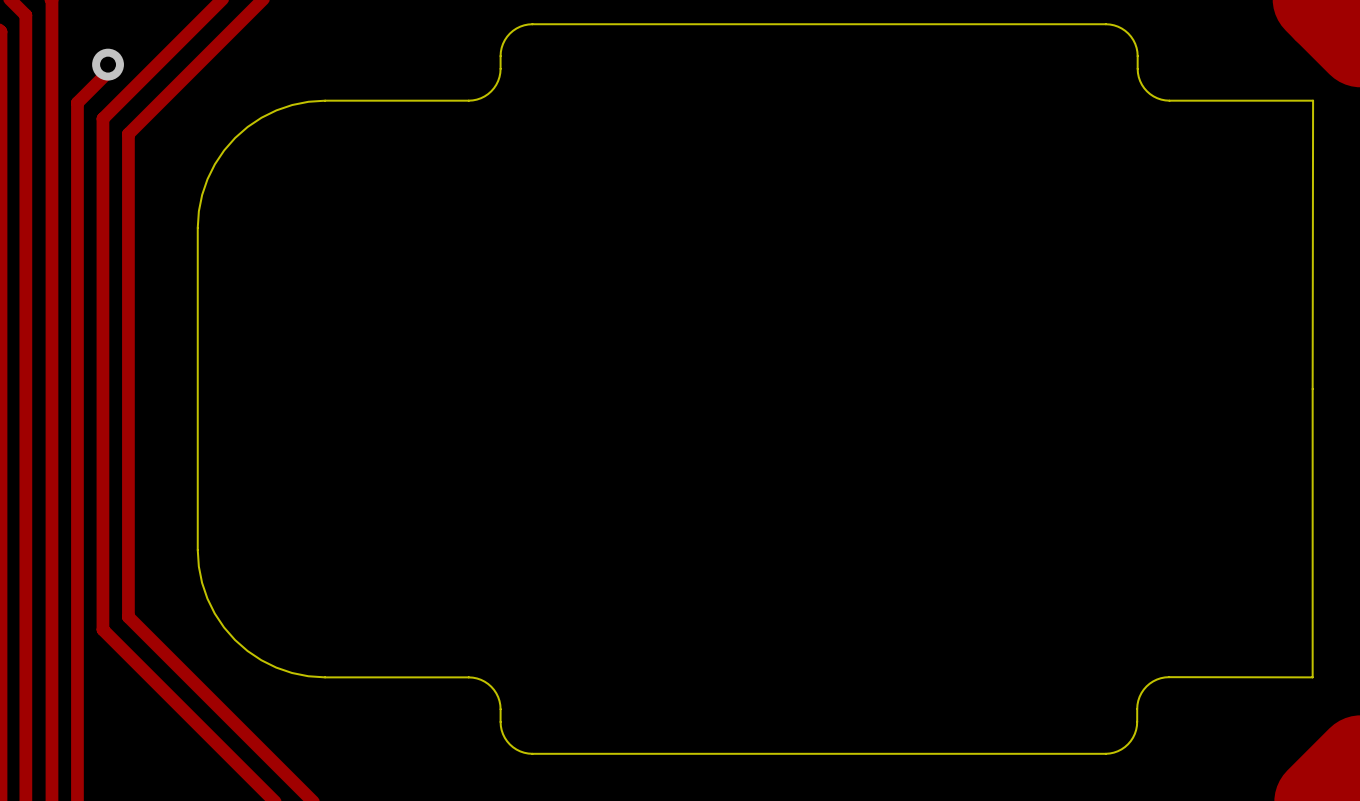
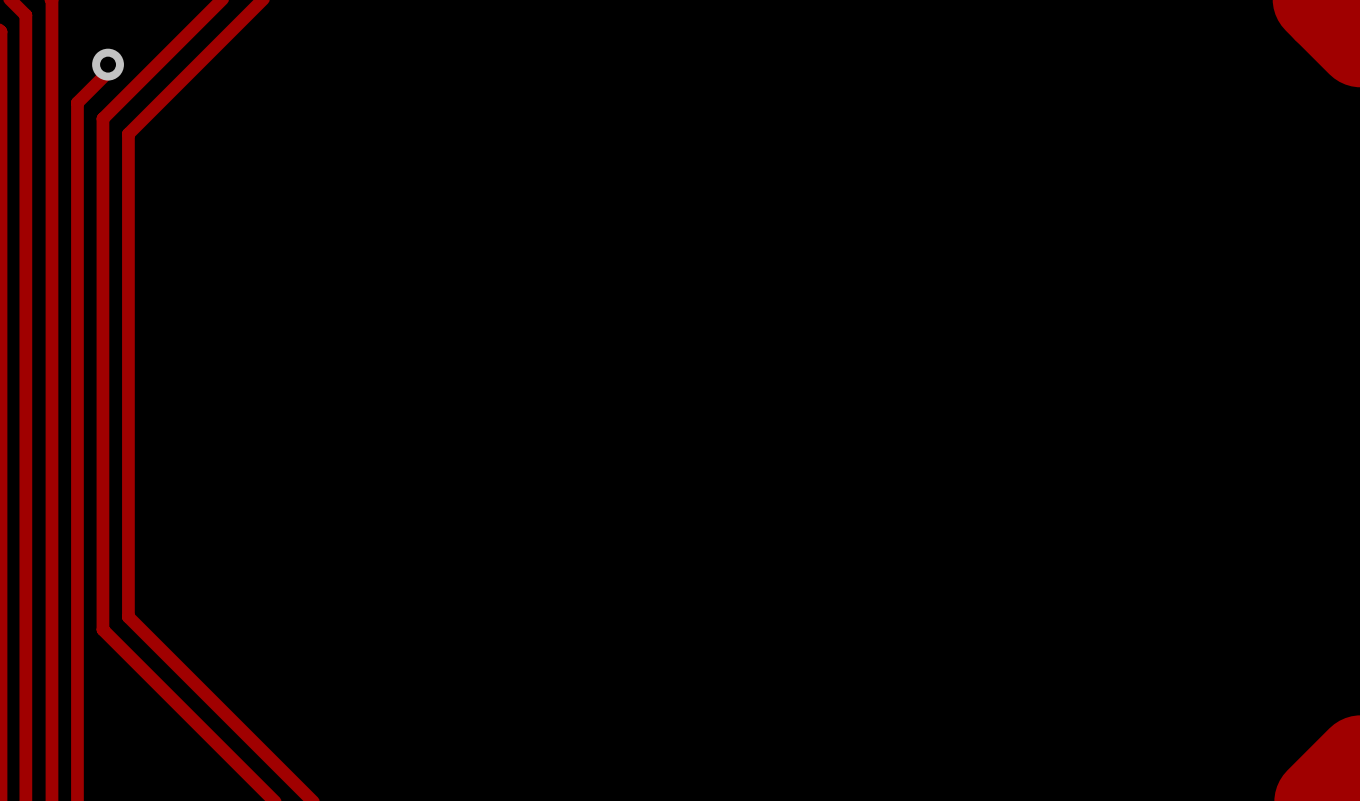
board edge: (197, 227) (202, 194) (214, 164) (235, 137) (261, 117) (276, 110) (308, 101) (468, 100) (480, 98) (491, 91) (498, 81) (500, 51) (504, 40) (513, 30) (528, 24) (1110, 24) (1121, 28) (1133, 40) (1137, 51) (1140, 81) (1146, 91) (1157, 98) (1169, 100) (1313, 100) (1312, 677) (1169, 677) (1156, 679) (1146, 686) (1139, 696) (1136, 725) (1133, 737) (1121, 749) (1109, 753) (532, 753) (520, 751) (507, 741) (501, 730) (498, 697) (491, 686) (480, 679) (468, 677) (325, 677) -> none
board edge: (197, 228) (197, 549) (202, 582) (214, 613) (224, 627) (247, 650) (261, 660) (292, 672) (324, 677) -> none

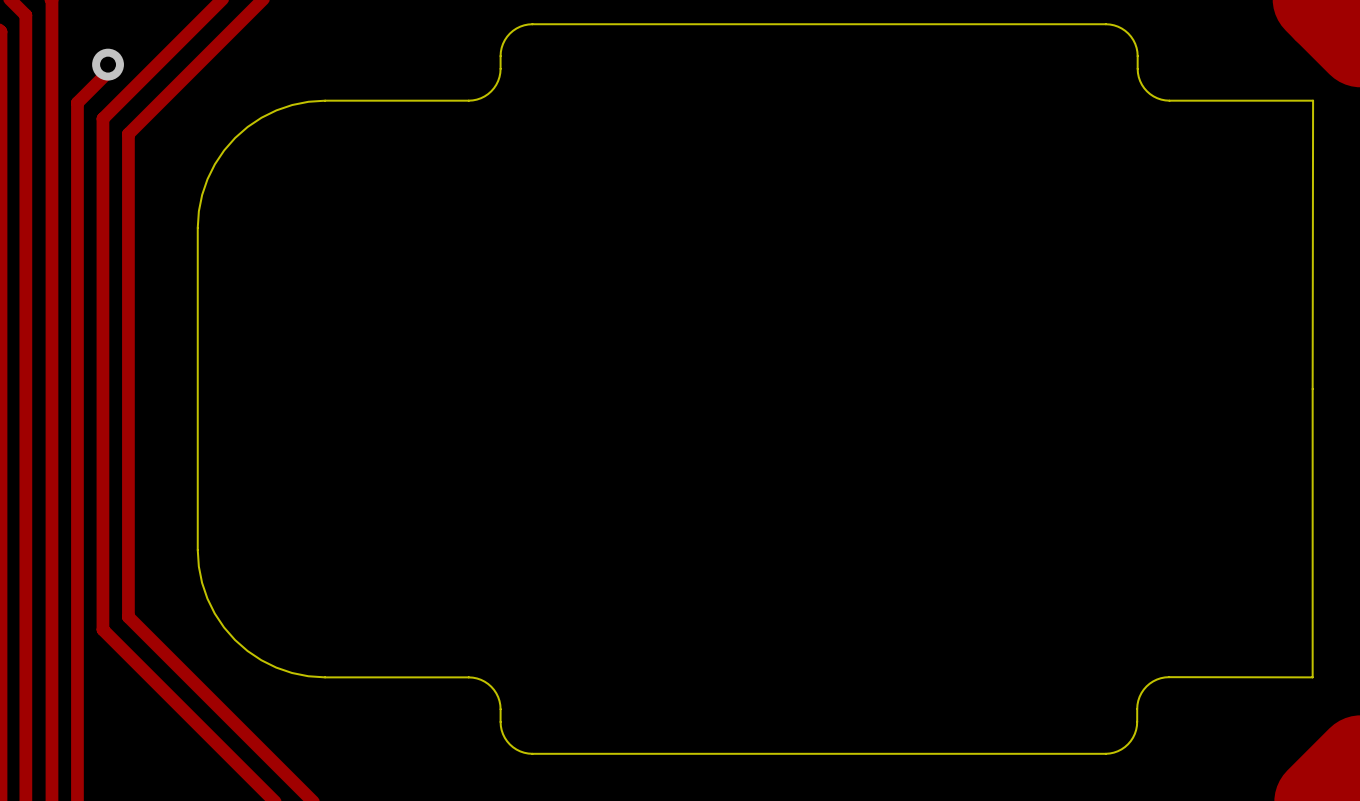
board edge: none -> (197, 227) (202, 194) (214, 164) (235, 137) (261, 117) (276, 110) (308, 101) (468, 100) (480, 98) (491, 91) (498, 81) (500, 51) (504, 40) (513, 30) (528, 24) (1110, 24) (1121, 28) (1133, 40) (1137, 51) (1140, 81) (1146, 91) (1157, 98) (1169, 100) (1313, 100) (1312, 677) (1169, 677) (1156, 679) (1146, 686) (1139, 696) (1136, 725) (1133, 737) (1121, 749) (1109, 753) (532, 753) (520, 751) (507, 741) (501, 730) (498, 697) (491, 686) (480, 679) (468, 677) (325, 677)
board edge: none -> (197, 228) (197, 549) (202, 582) (214, 613) (224, 627) (247, 650) (261, 660) (292, 672) (324, 677)

